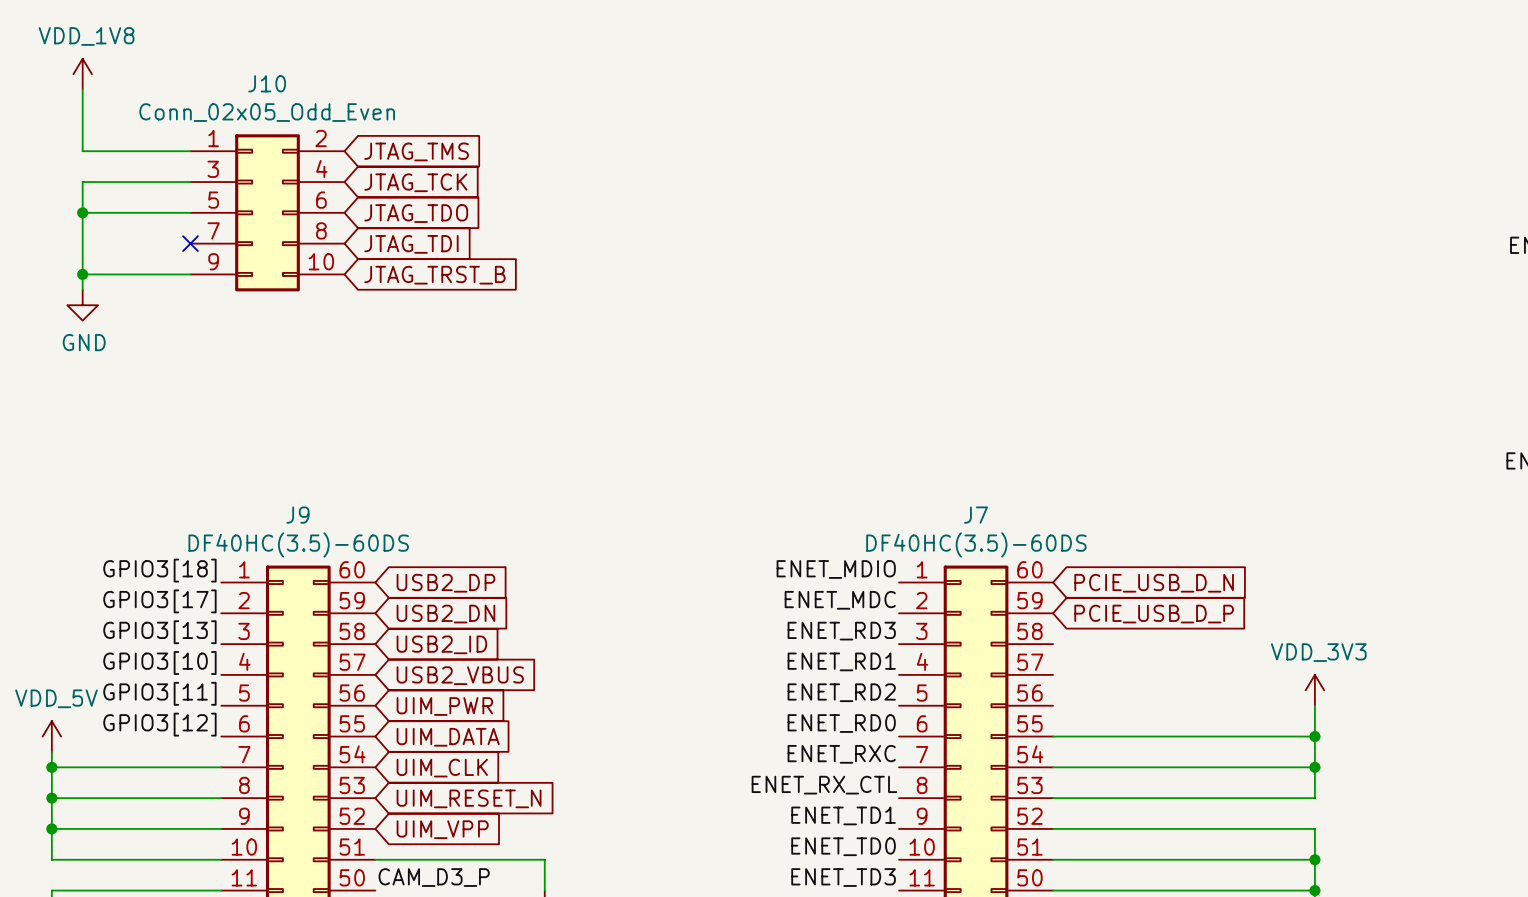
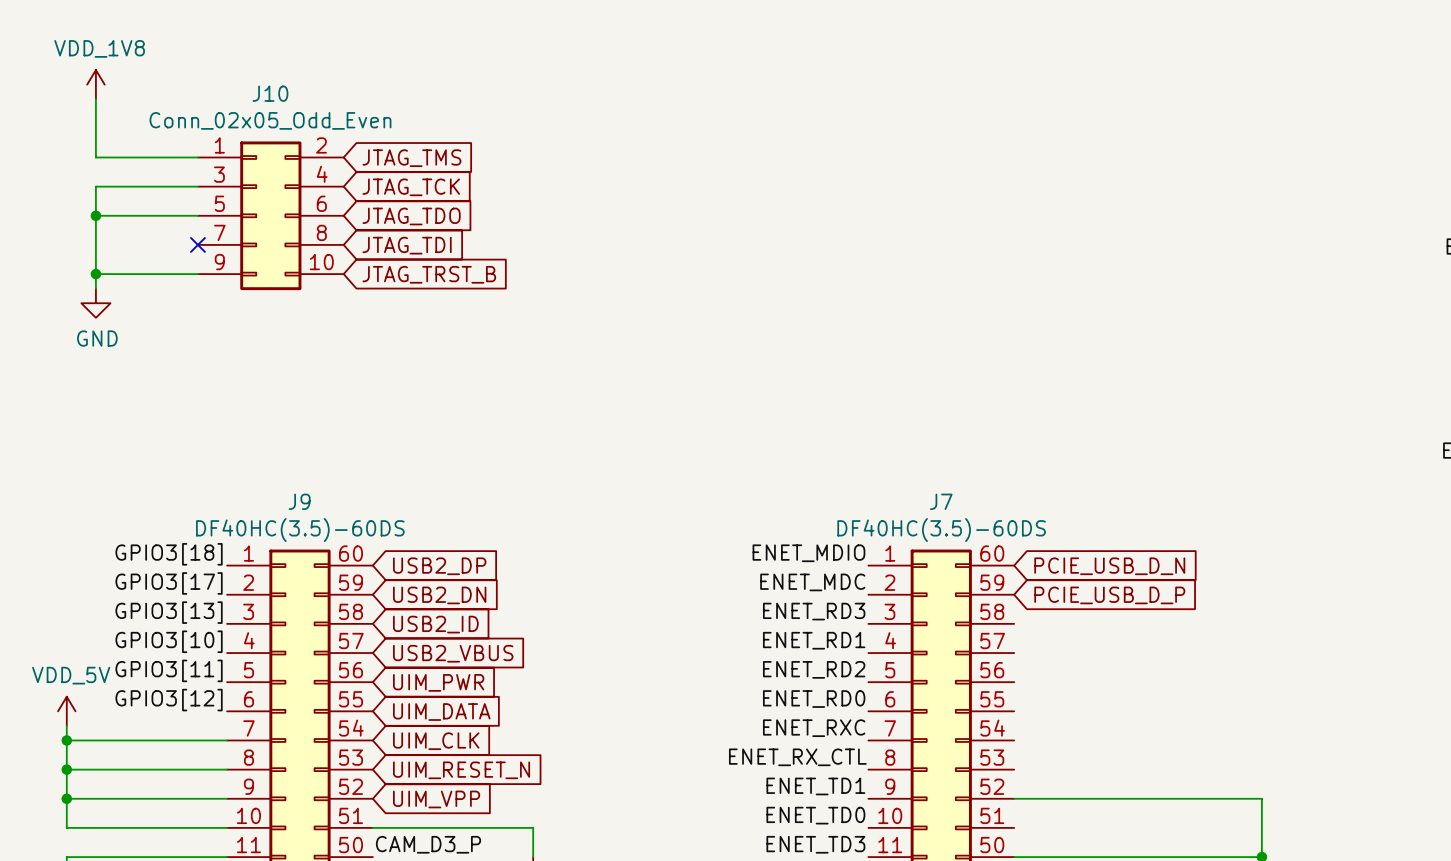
power symbol: VDD_3V3 (1314, 690) -> none
wire: (1314, 705) (1314, 798) (1053, 798) -> none
wire: (1053, 736) (1314, 736) -> none
junction: (1314, 736) -> none
wire: (1053, 767) (1314, 767) -> none
junction: (1314, 767) -> none
wire: (1053, 859) (1314, 859) -> none
junction: (1314, 859) -> none

